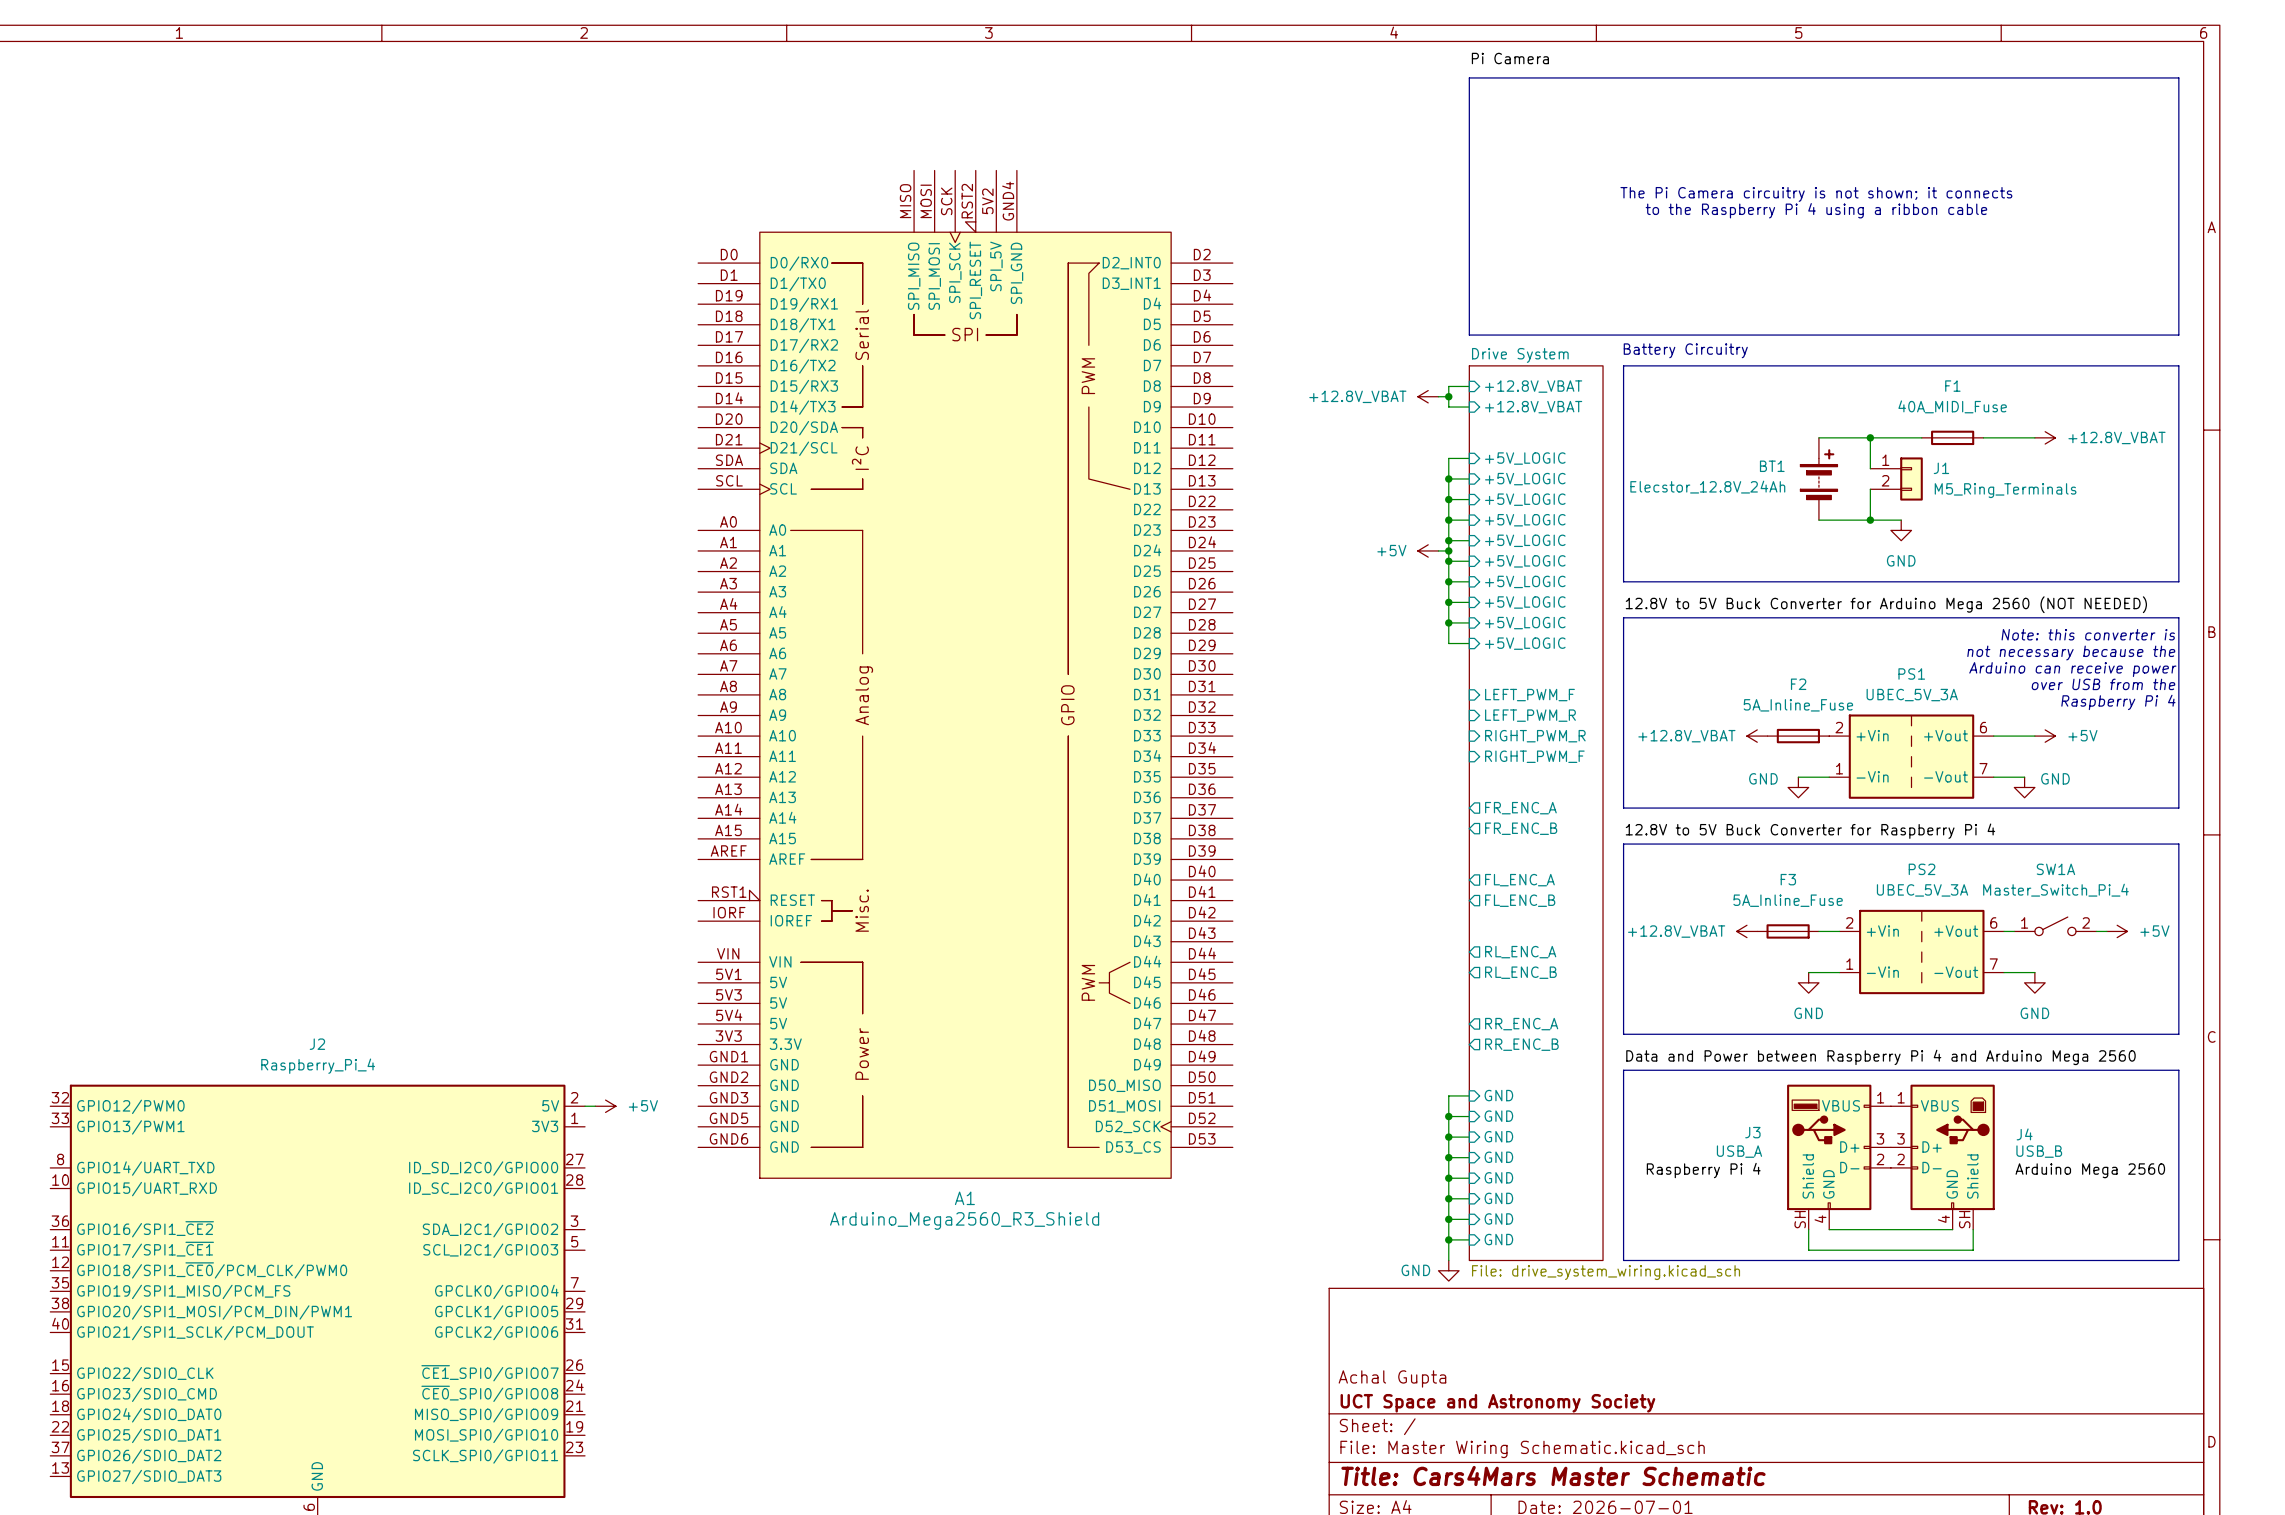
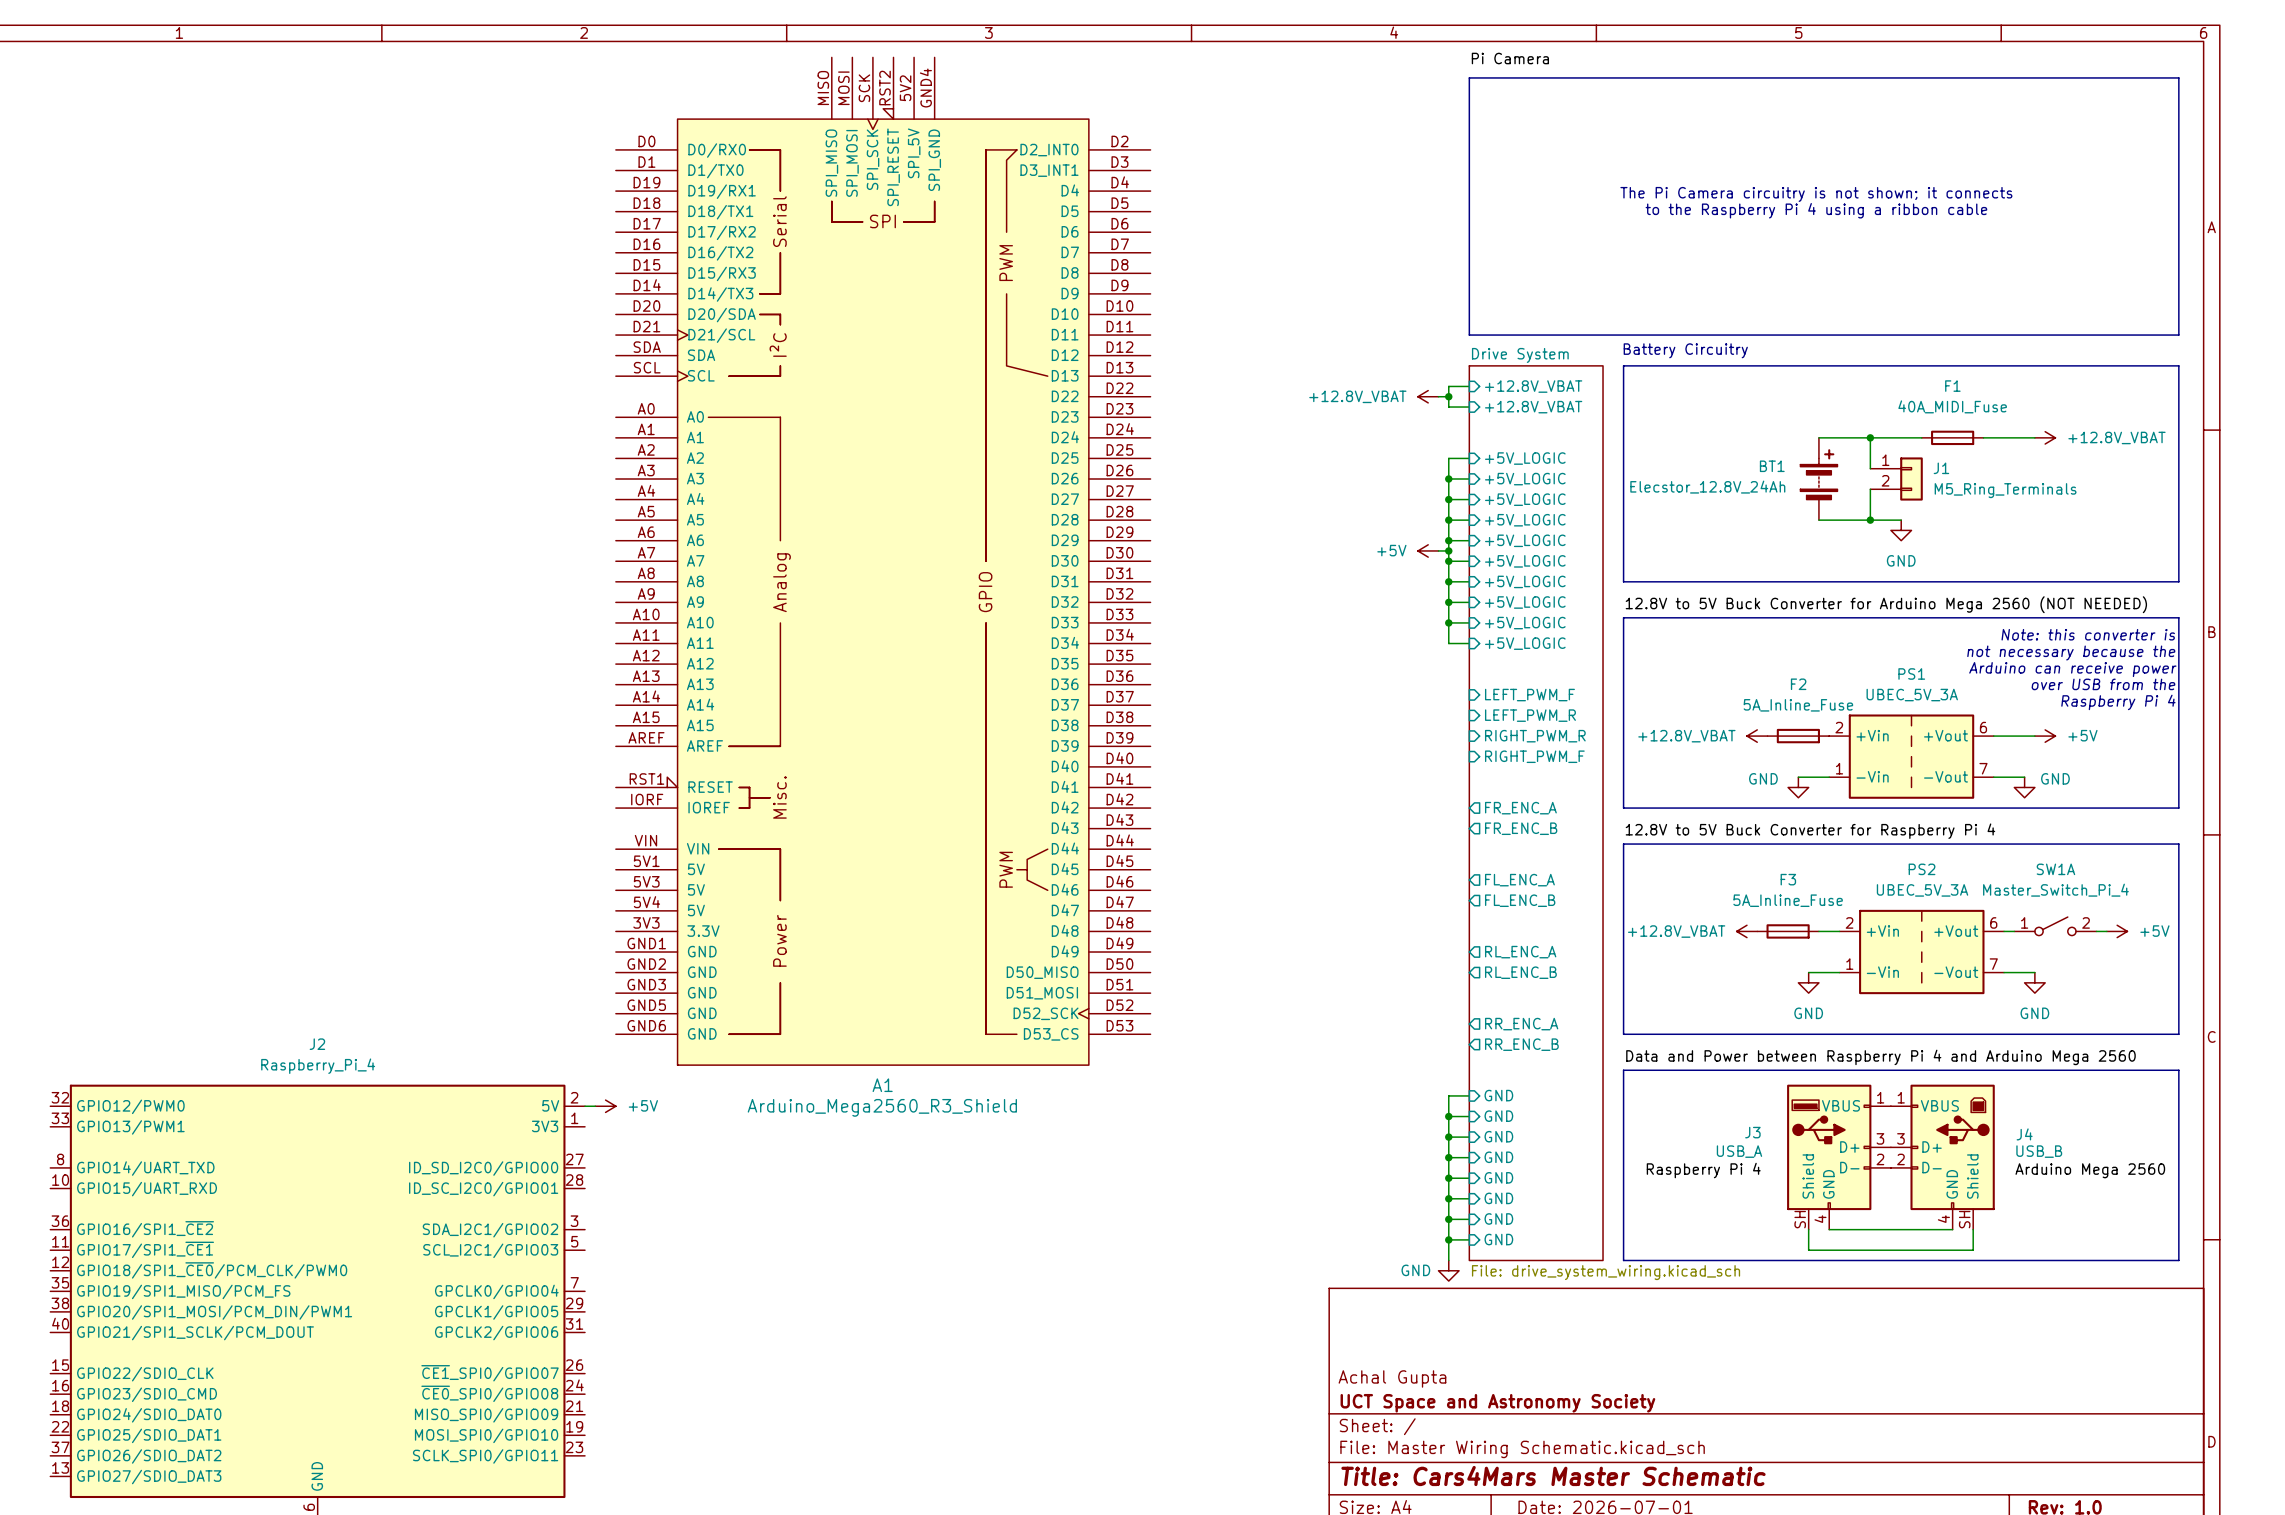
A1 position: (965, 674) -> (883, 561)

